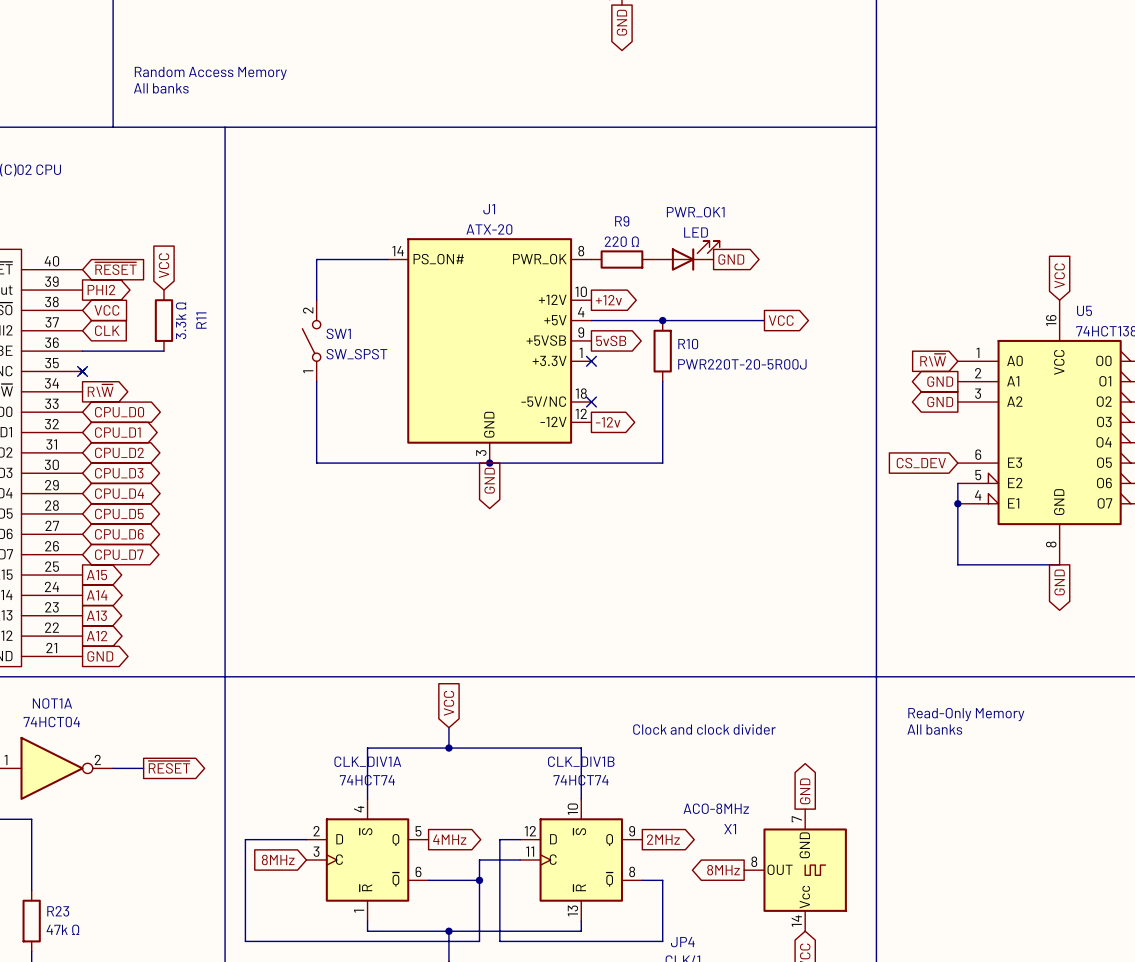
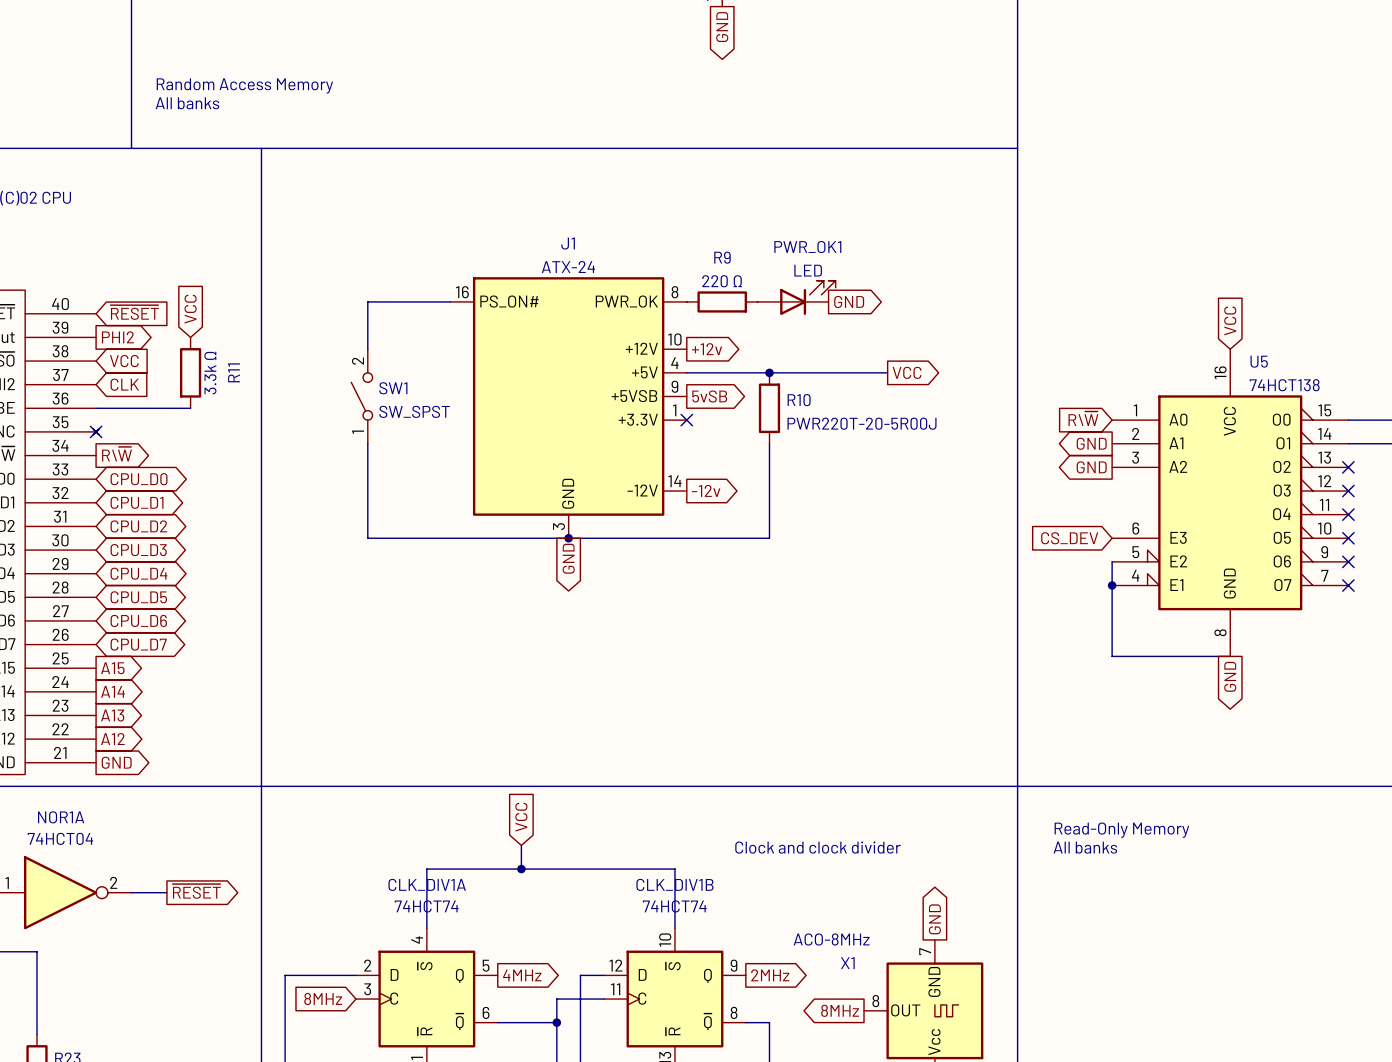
J1 value: ATX-20 (489, 229) -> ATX-24 (568, 267)
J1 symbol: [387, 238, 592, 464] -> [450, 277, 687, 539]
no-connect mark: (591, 402) -> none
NOT1A name: NOT1A (52, 703) -> NOR1A (61, 817)

